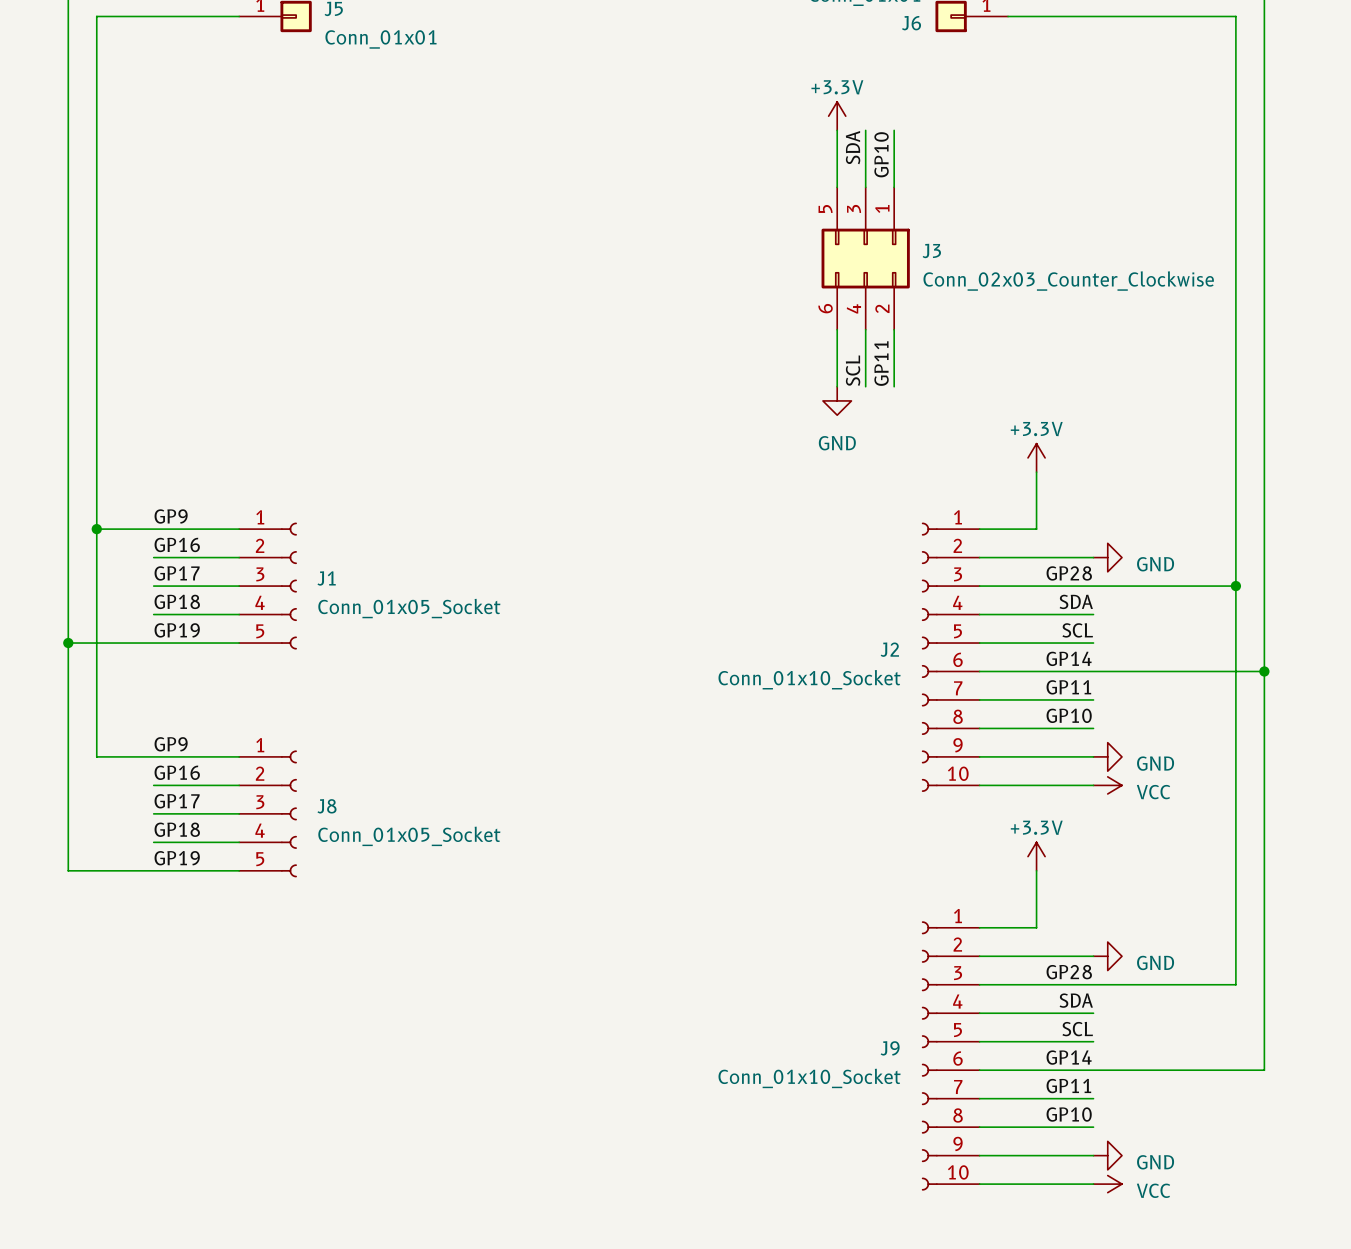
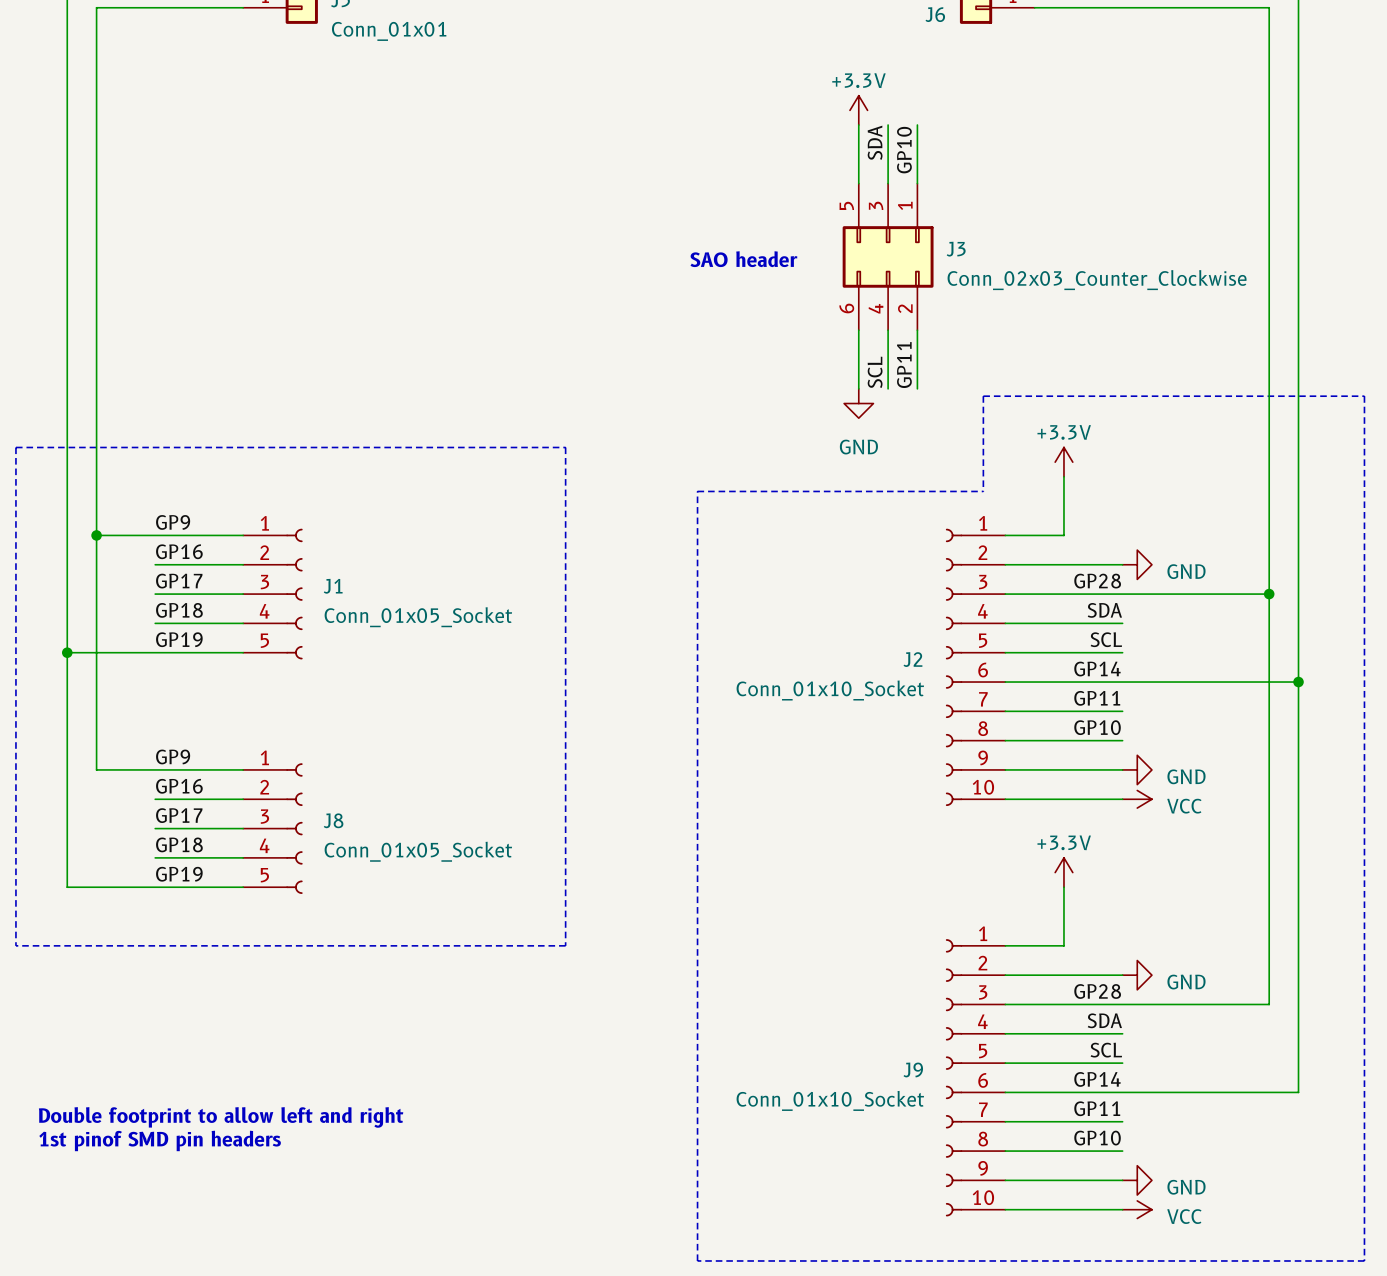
text: none -> SAO header (743, 259)
line: none -> (983, 396) (1364, 396) (1364, 1260) (697, 1260) (697, 491) (983, 491) (983, 396)
line: none -> (15, 447) (15, 945) (565, 945) (565, 447) (15, 447)
text: none -> Double footprint to allow left and right (221, 1117)
text: none -> 1st pinof SMD pin headers (160, 1140)

